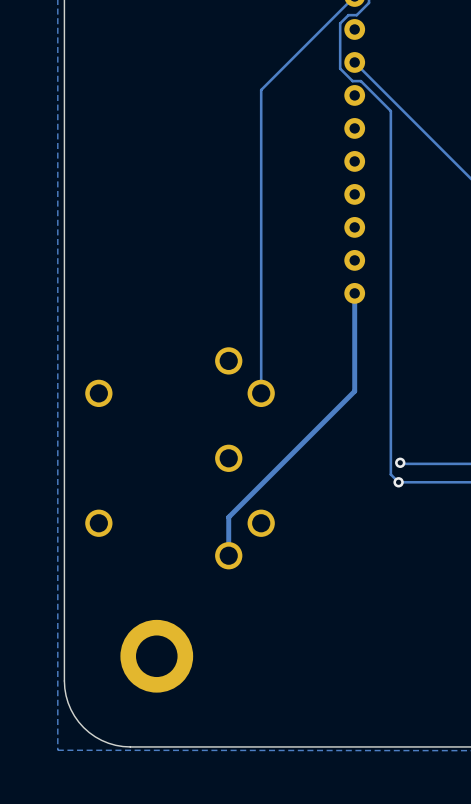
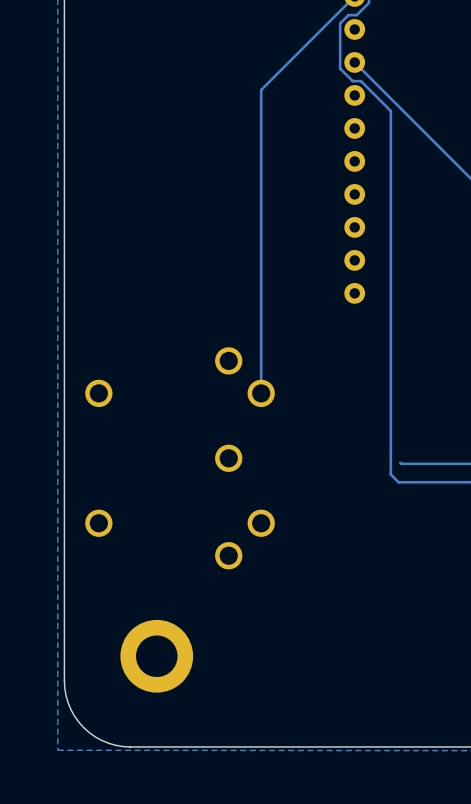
track: (354, 293) (354, 391) (228, 517) (228, 555) -> none
via: (400, 462) -> none
via: (398, 482) -> none

